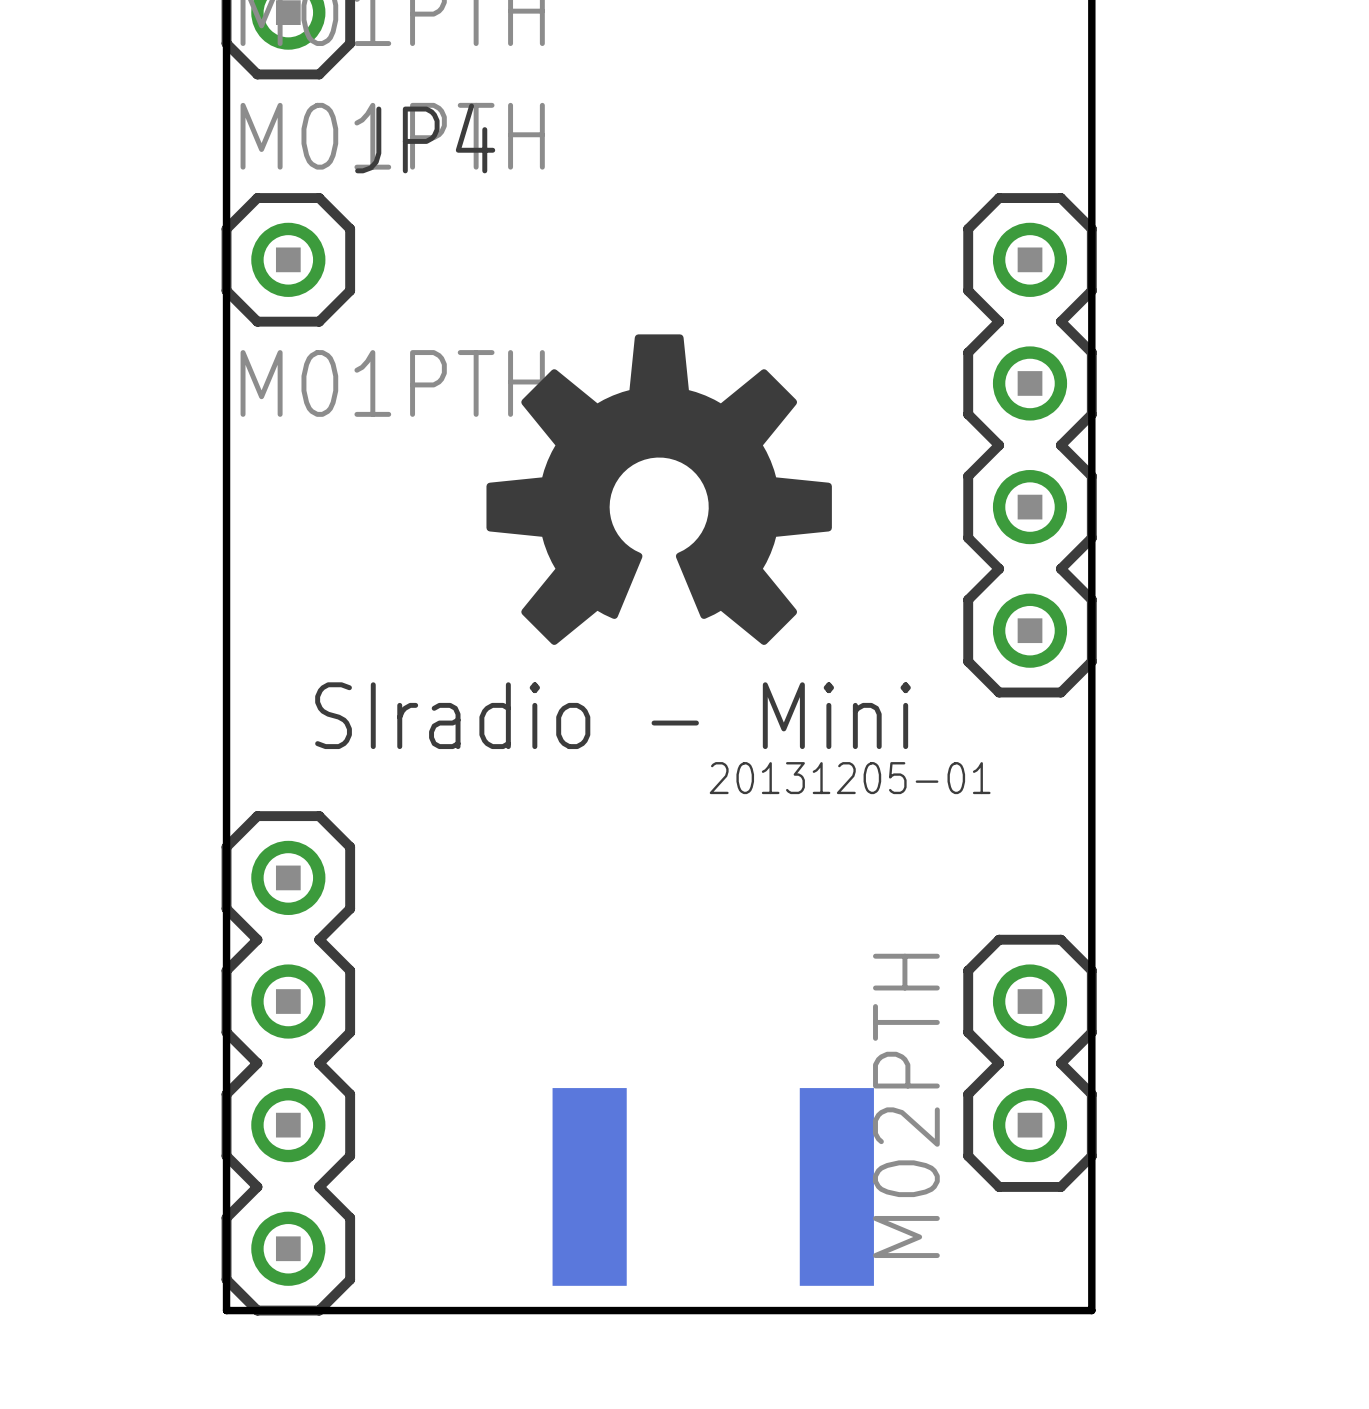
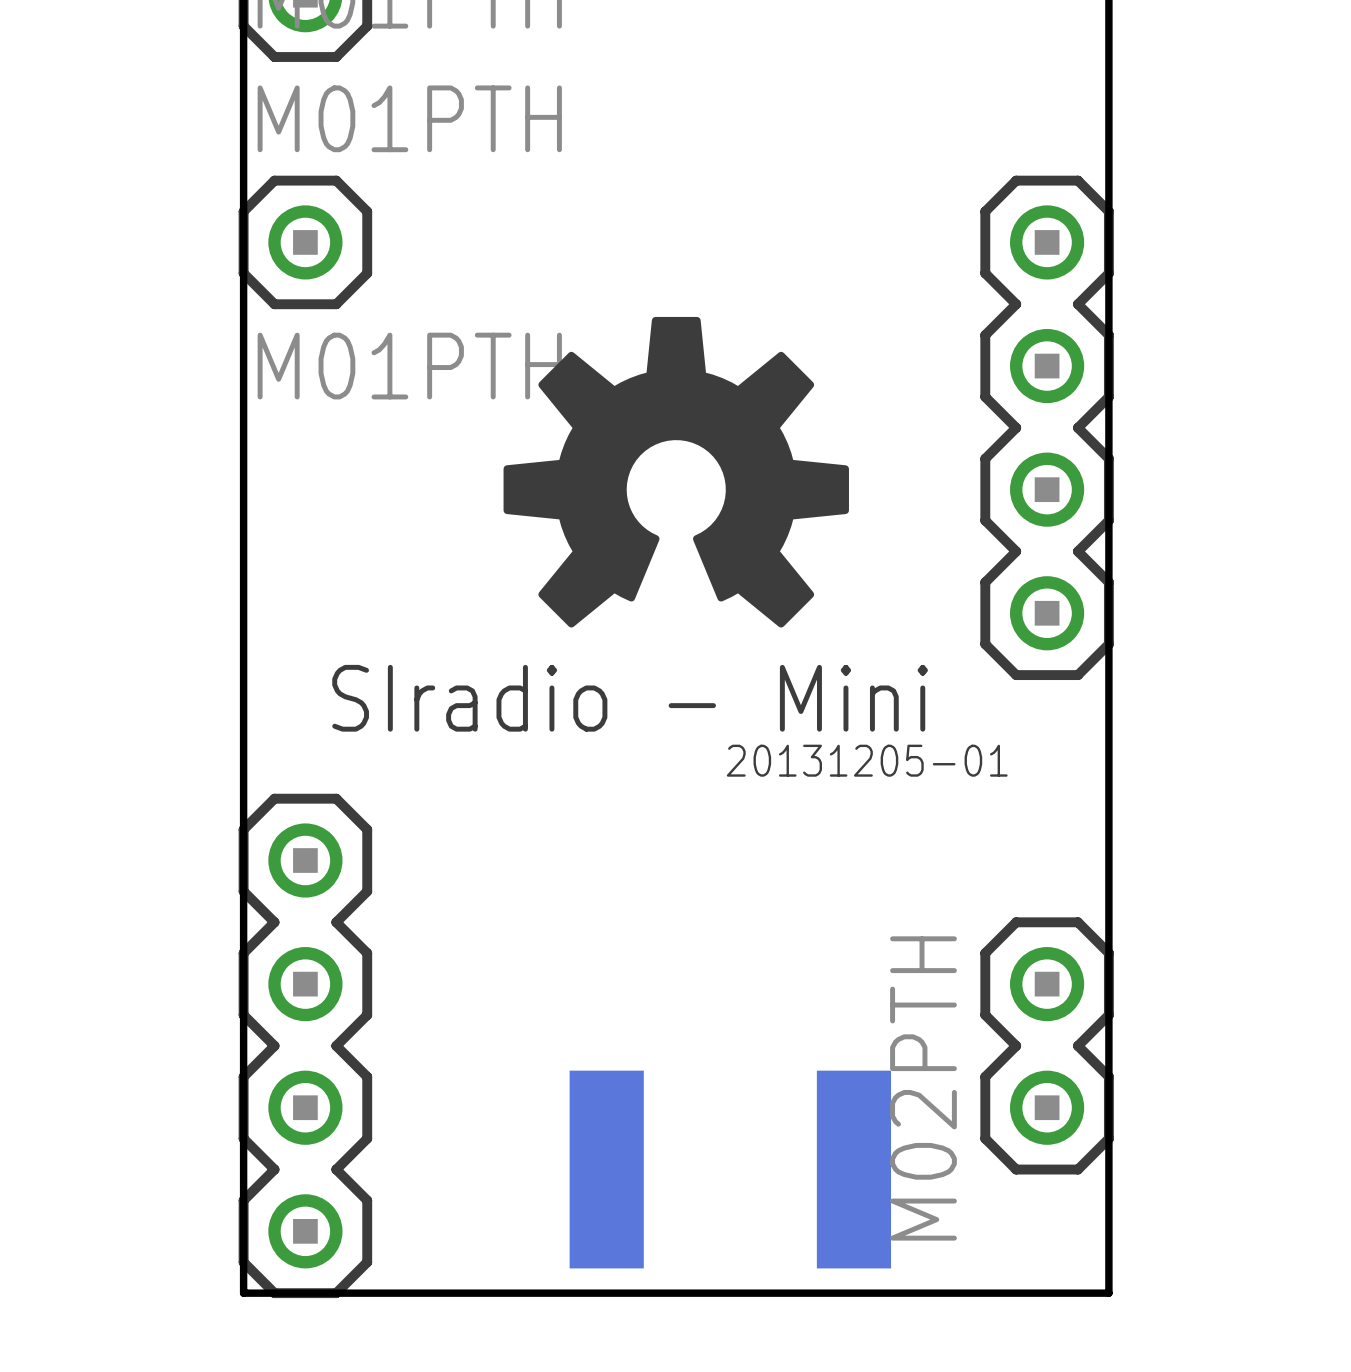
JP4 name: JP4 (425, 138) -> none

